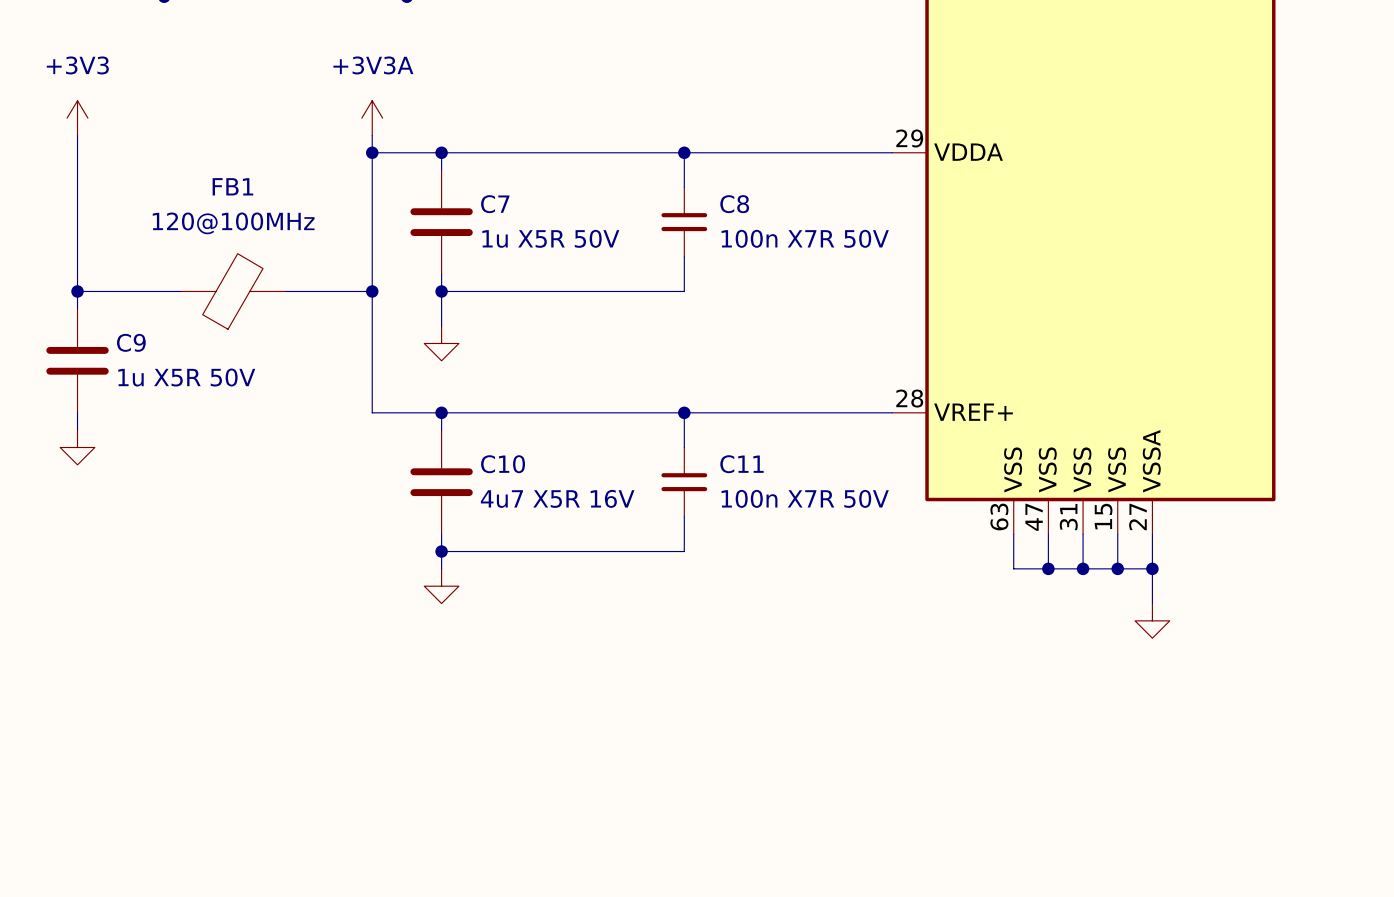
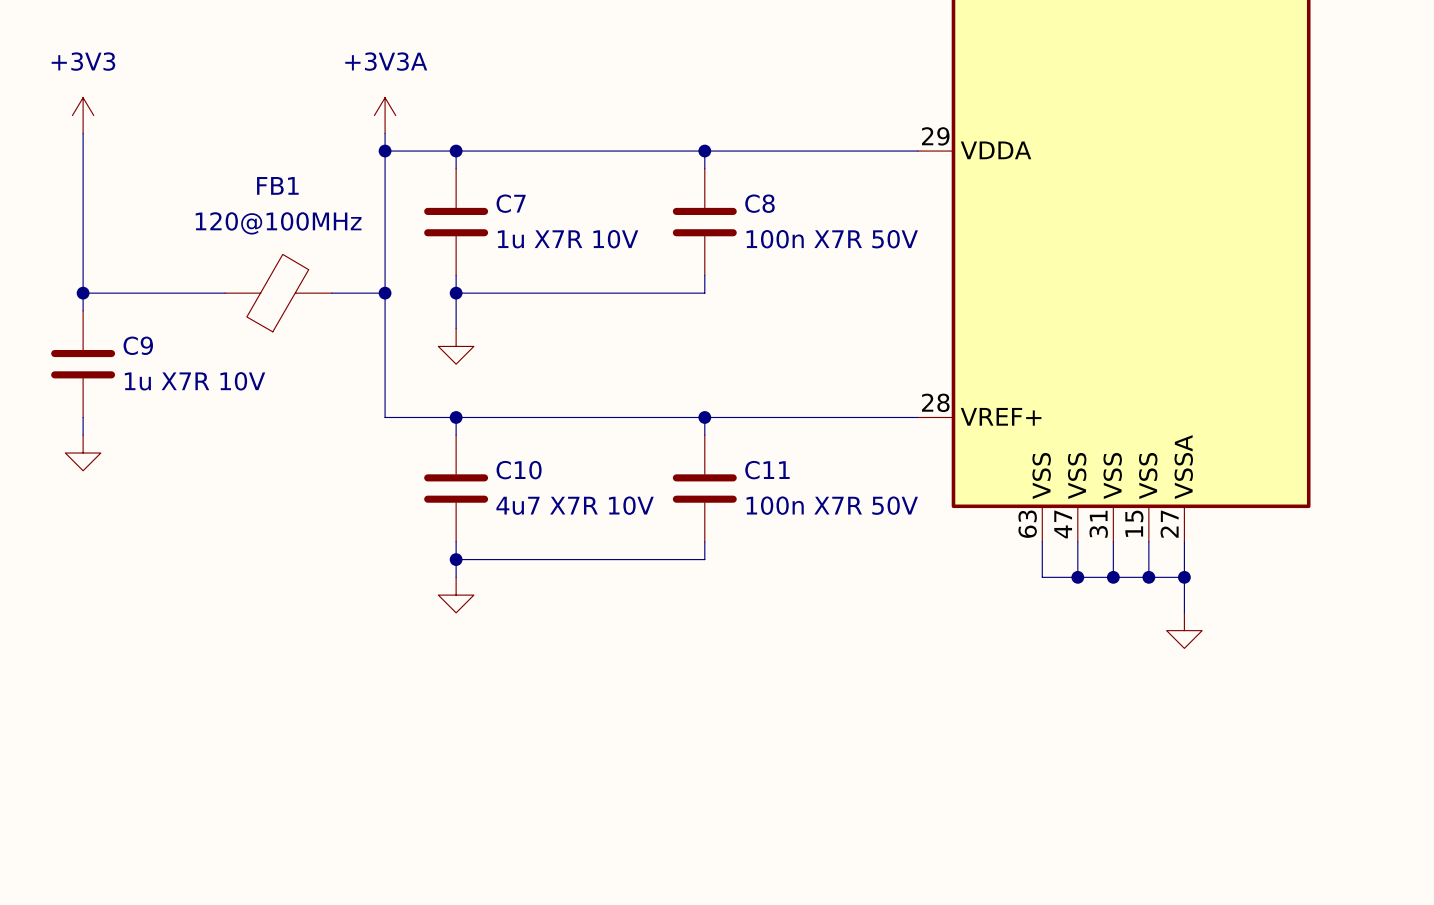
C8 symbol: [661, 187, 708, 257] -> [672, 168, 737, 276]
C7 value: 1u X5R 50V (550, 238) -> 1u X7R 10V (568, 239)
FB1 position: (233, 291) -> (278, 293)
C9 value: 1u X5R 50V (186, 377) -> 1u X7R 10V (195, 381)
C11 symbol: [661, 447, 708, 517] -> [672, 435, 737, 542]
C10 value: 4u7 X5R 16V (557, 498) -> 4u7 X7R 10V (575, 505)

